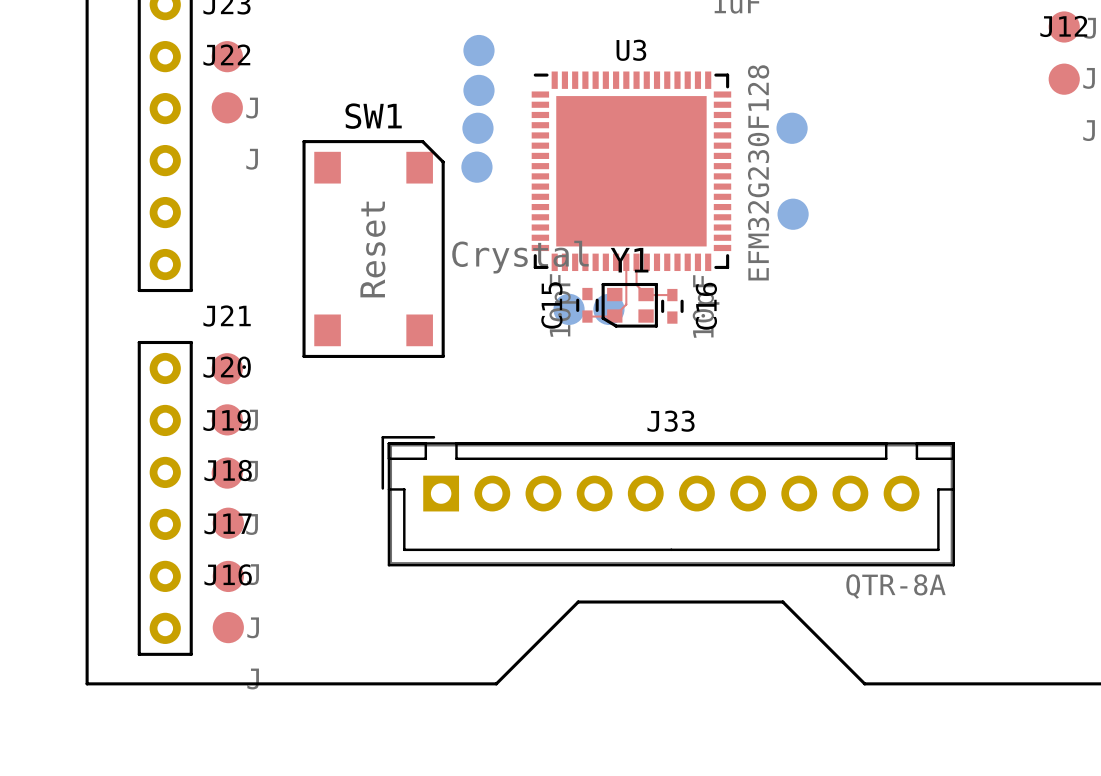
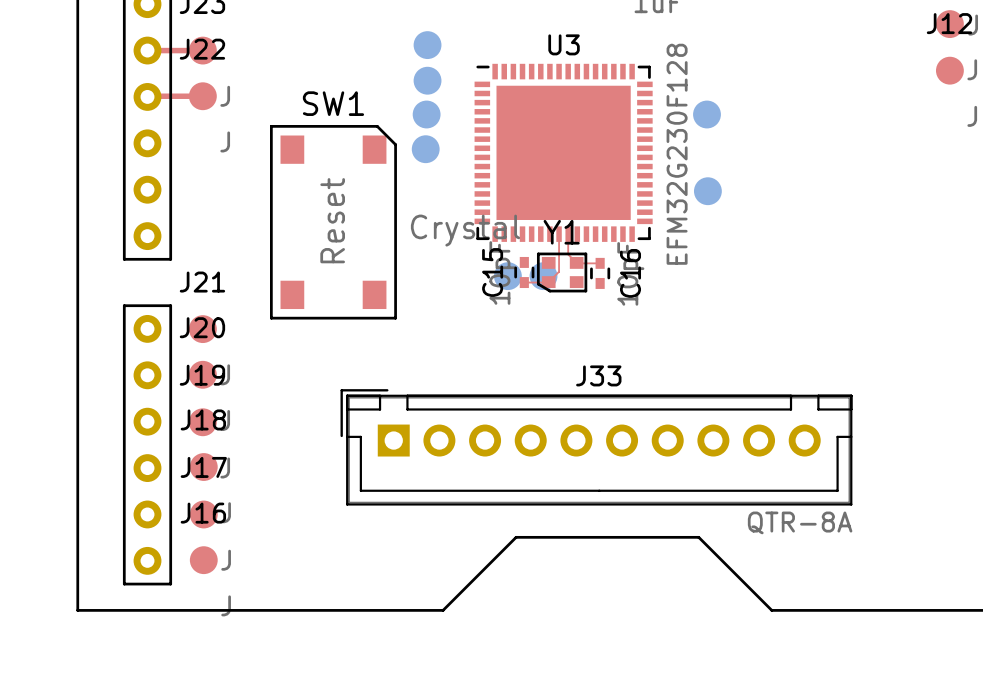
top track: none -> (147, 50) (202, 50)
top track: none -> (202, 96) (147, 96)

